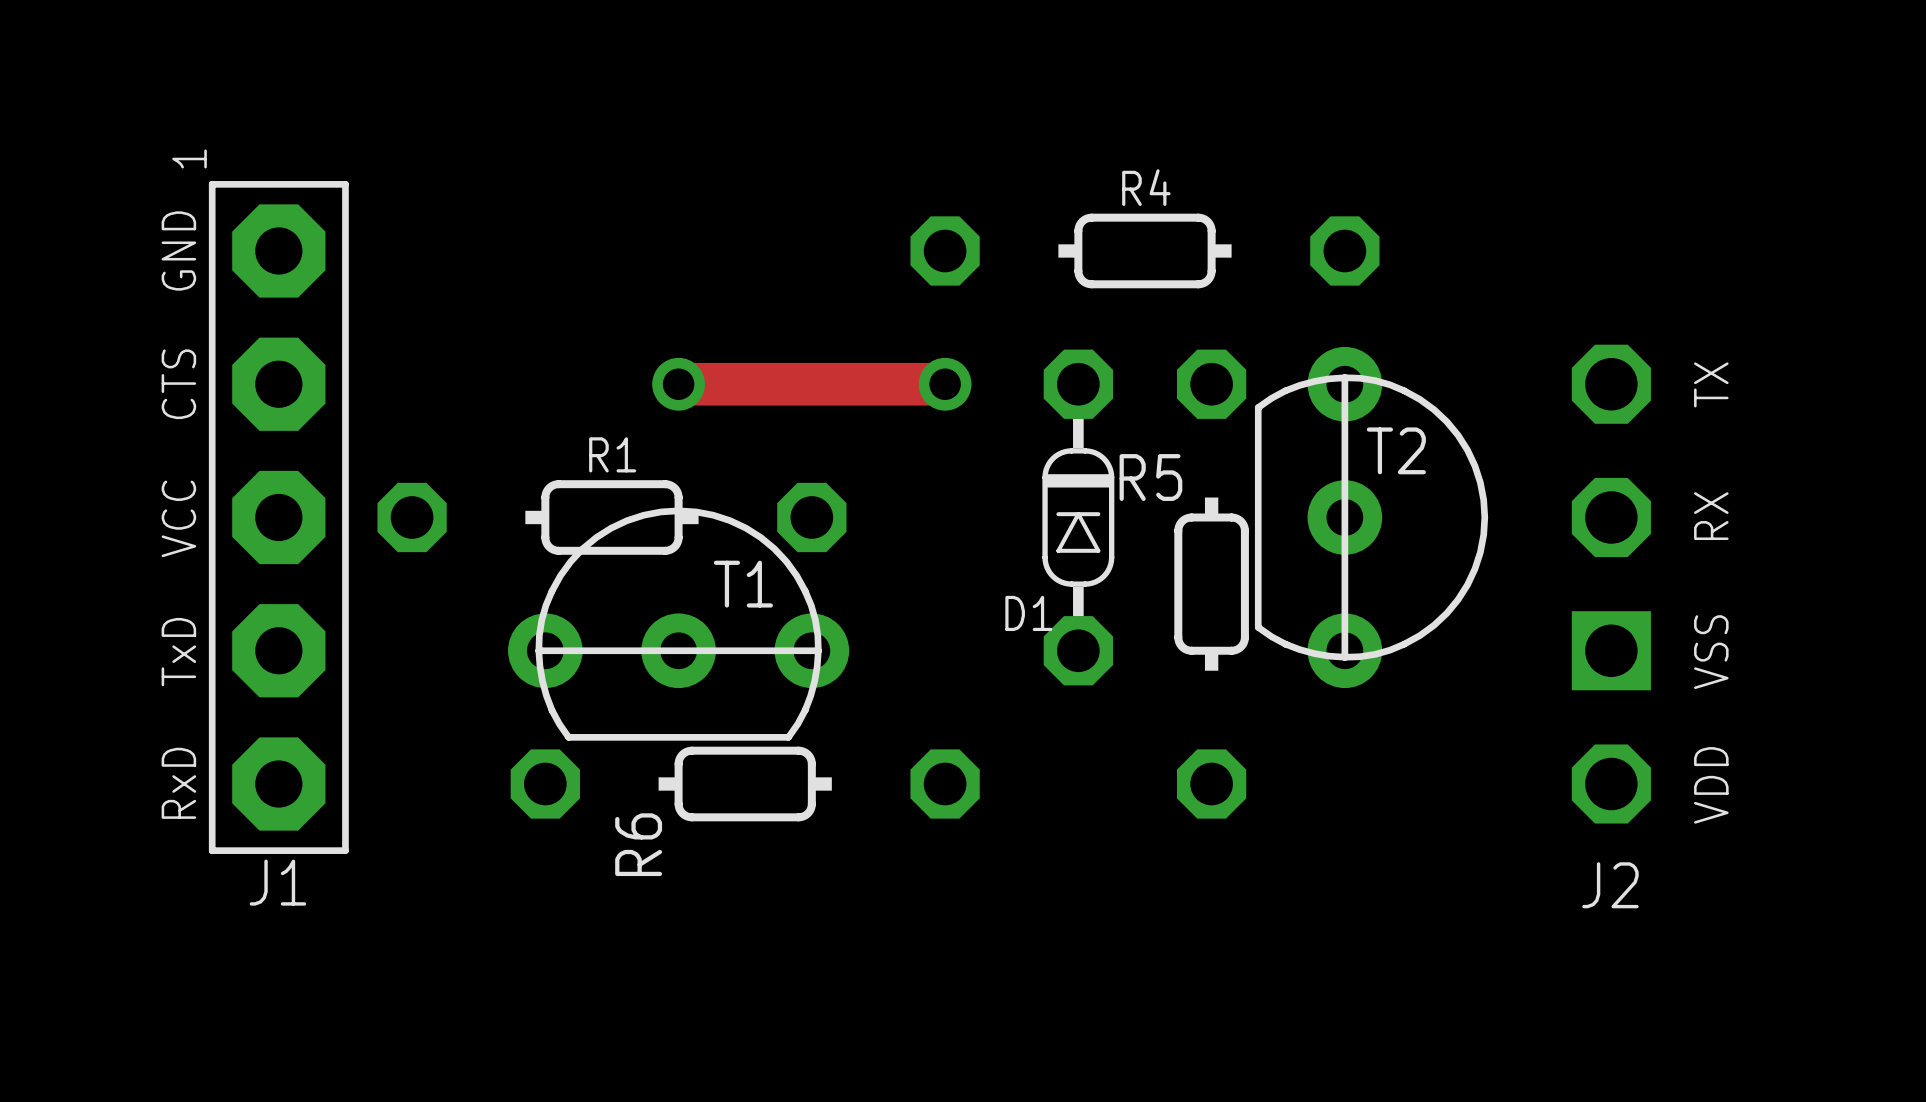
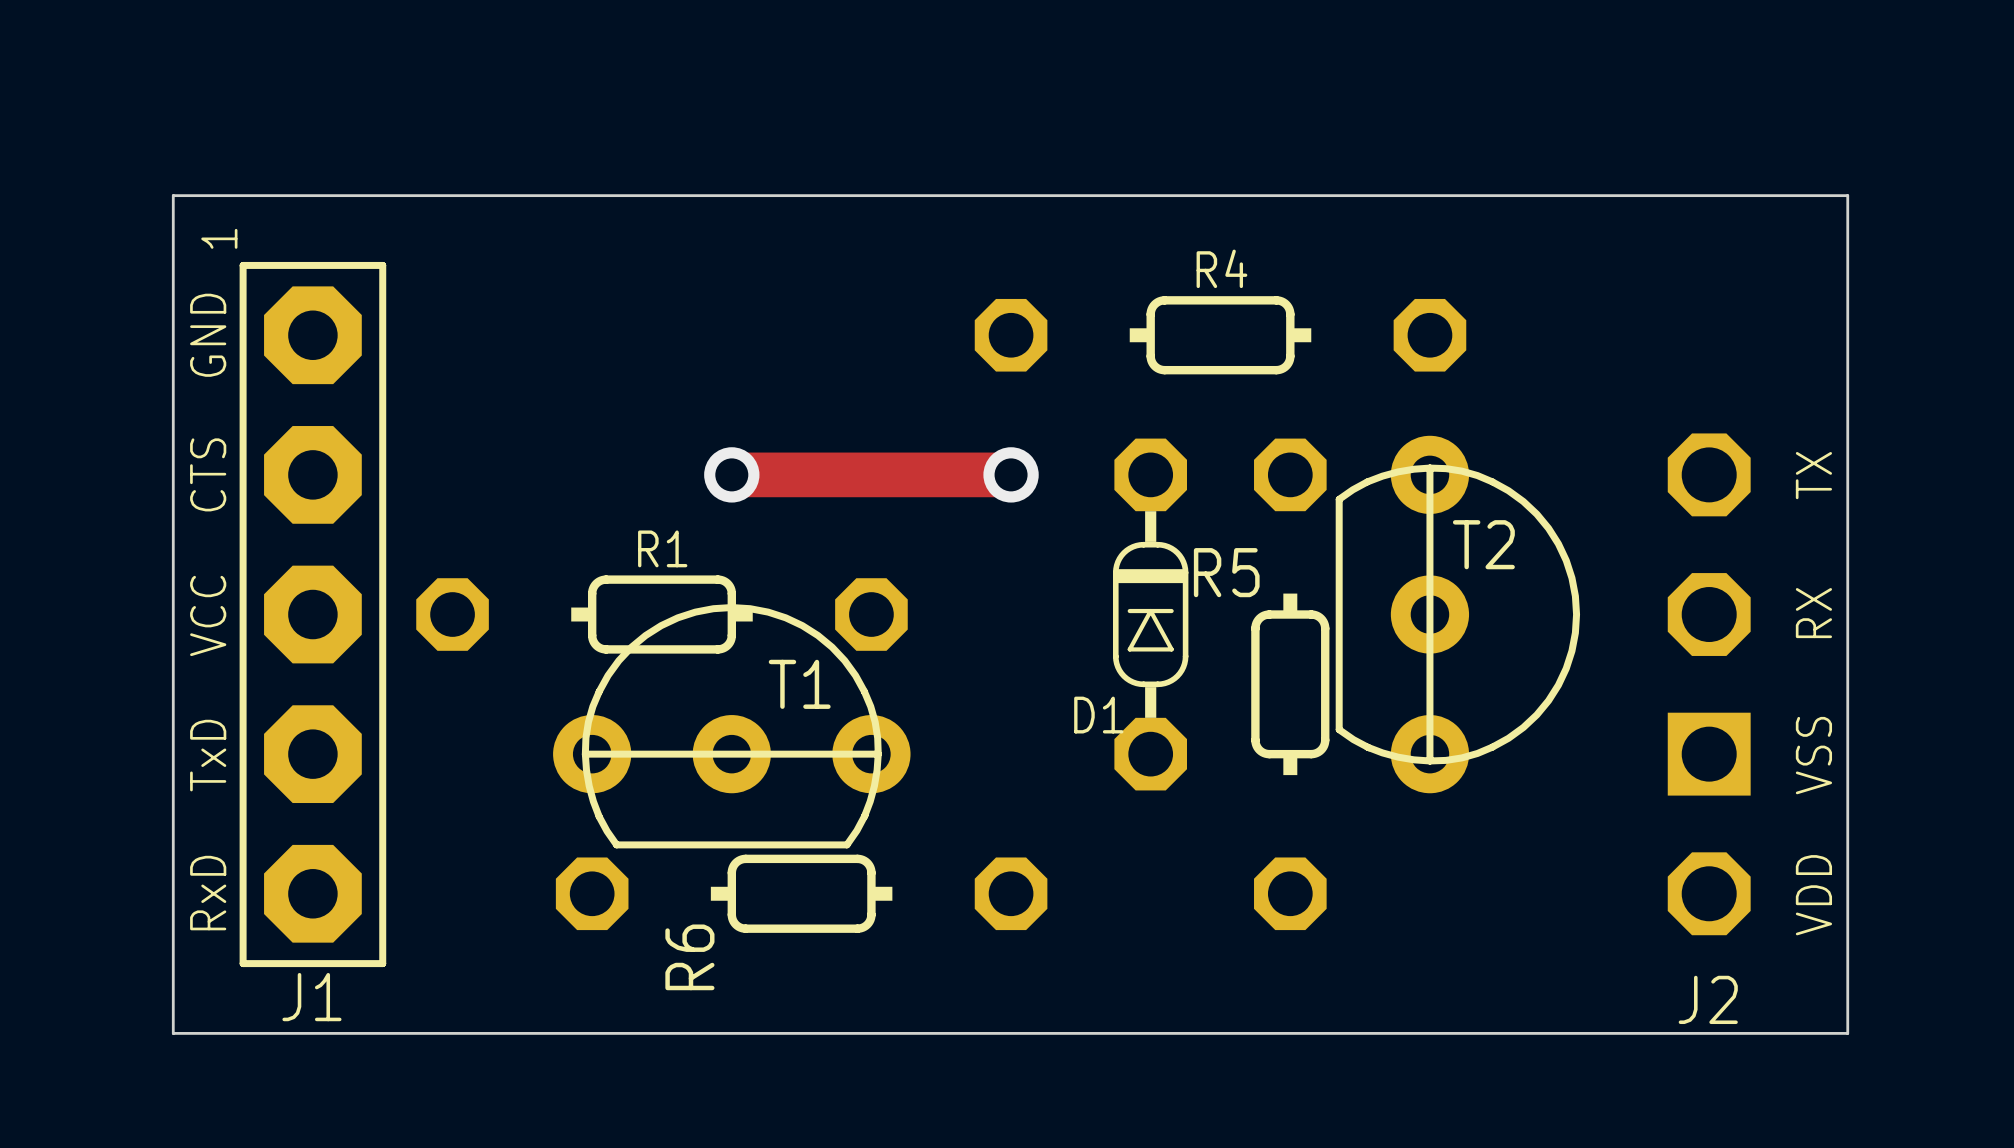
board edge: none -> (173, 195) (1847, 195) (1847, 1033) (173, 1033) (173, 195)

